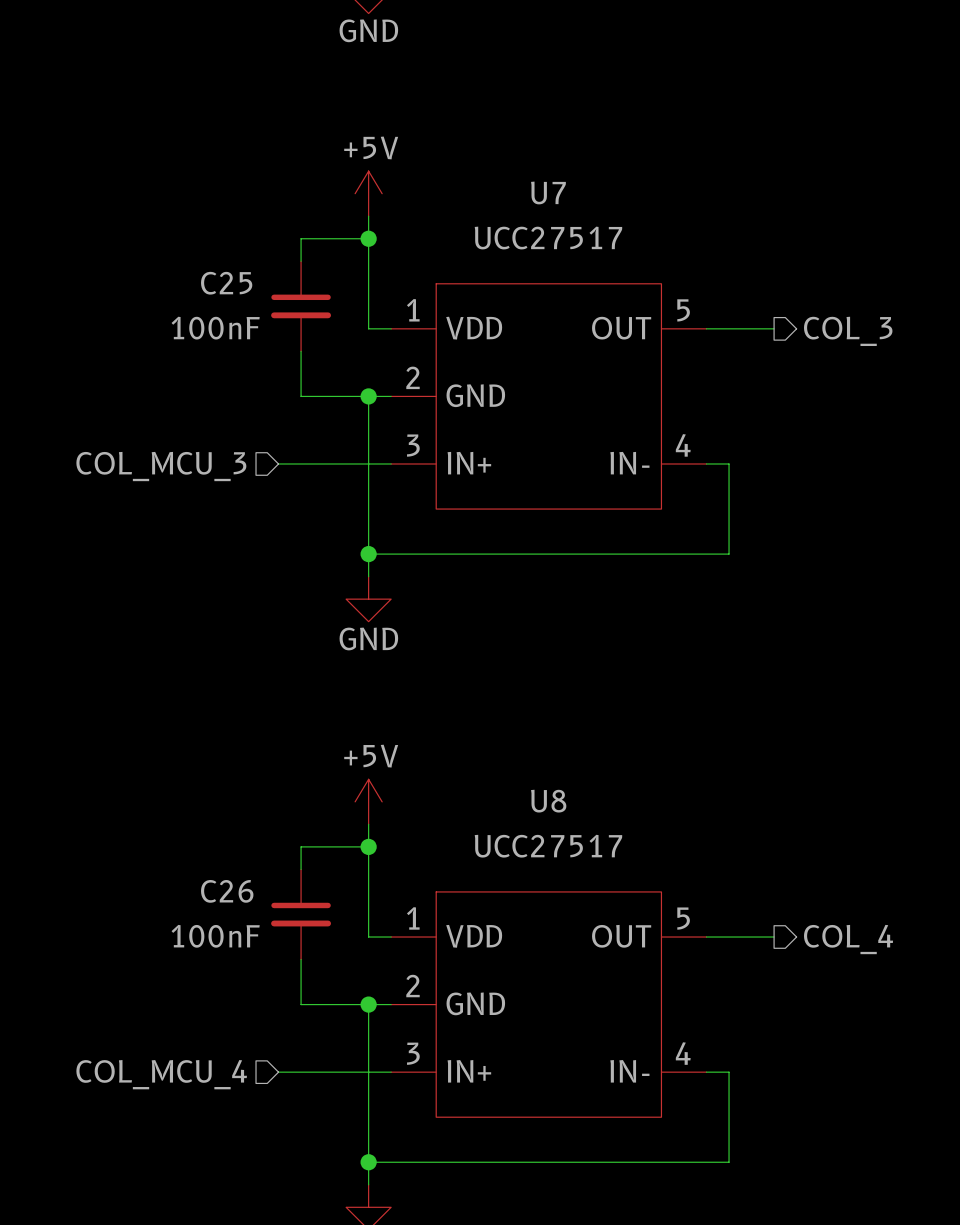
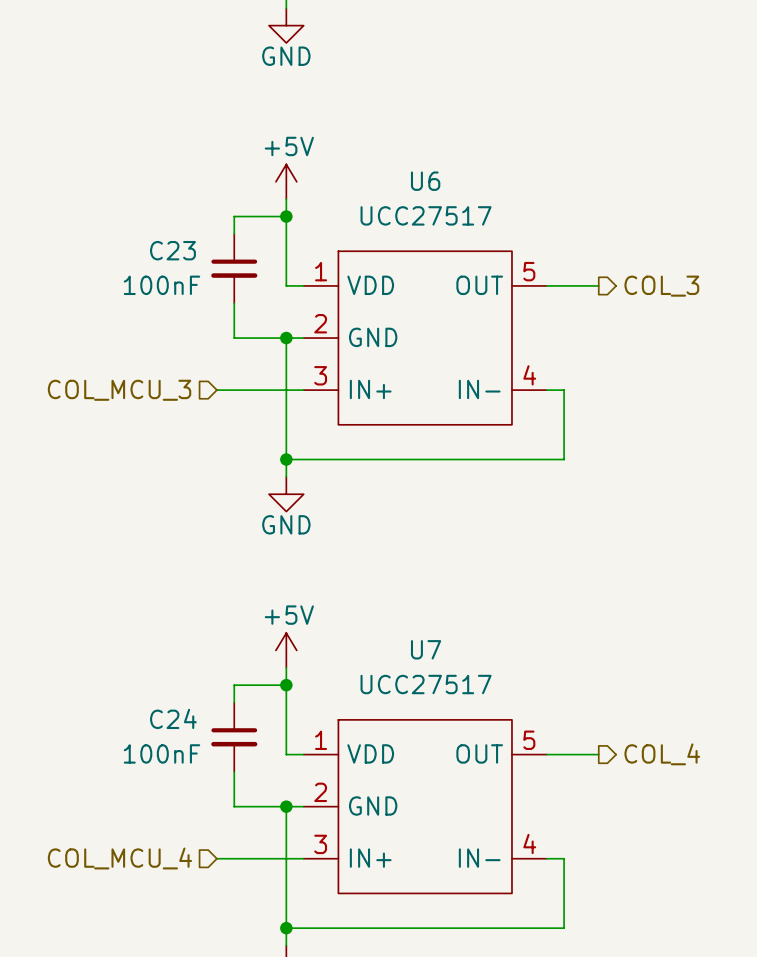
U7 name: U7 (548, 192) -> U6 (425, 181)
C25 name: C25 (226, 283) -> C23 (172, 250)
U8 name: U8 (548, 801) -> U7 (426, 649)
C26 name: C26 (227, 891) -> C24 (173, 718)

